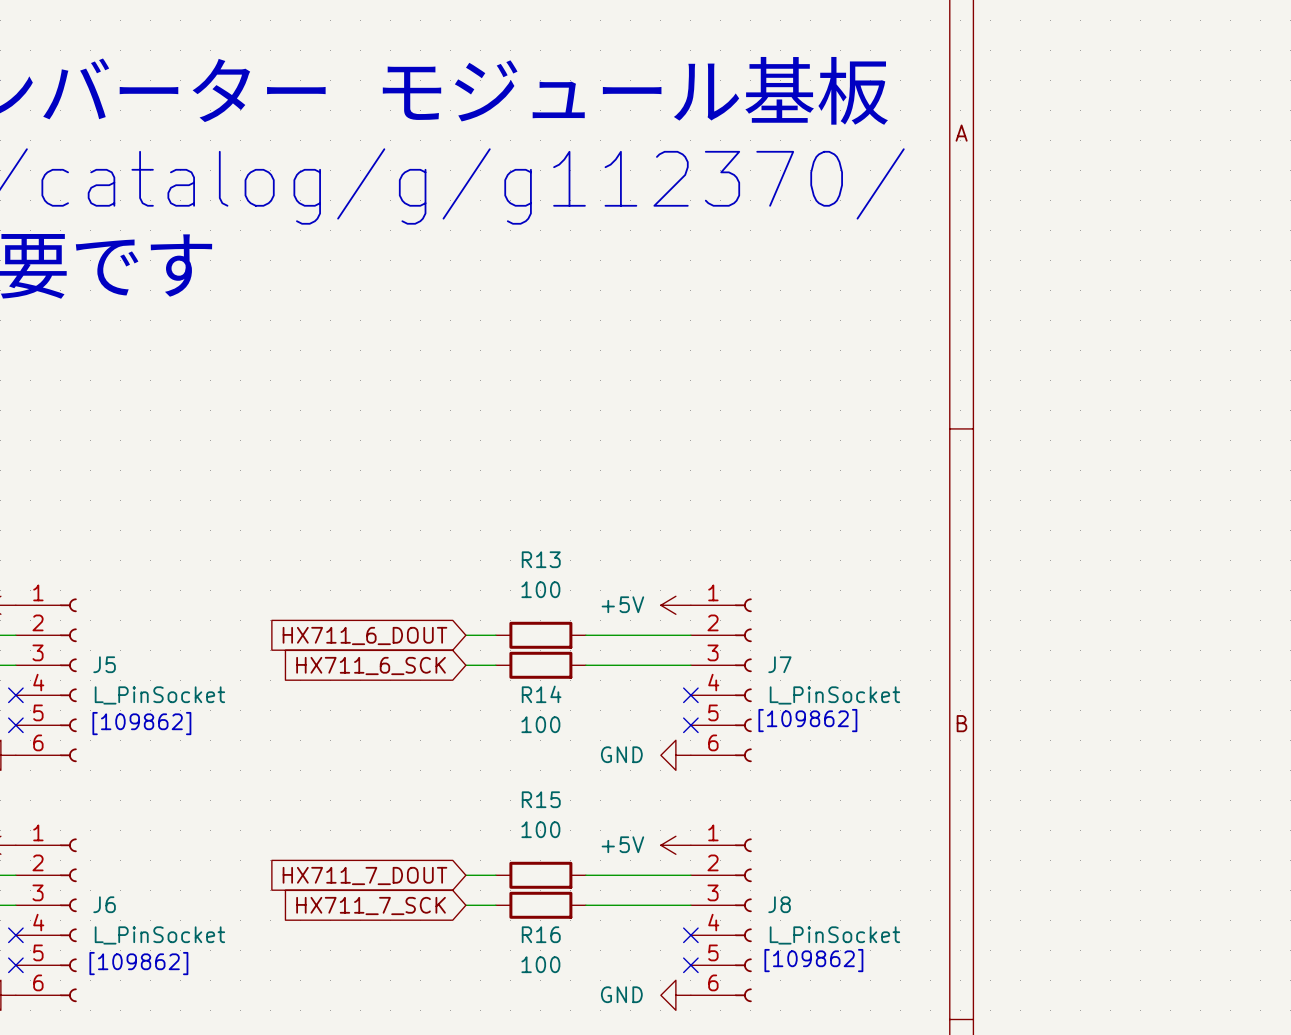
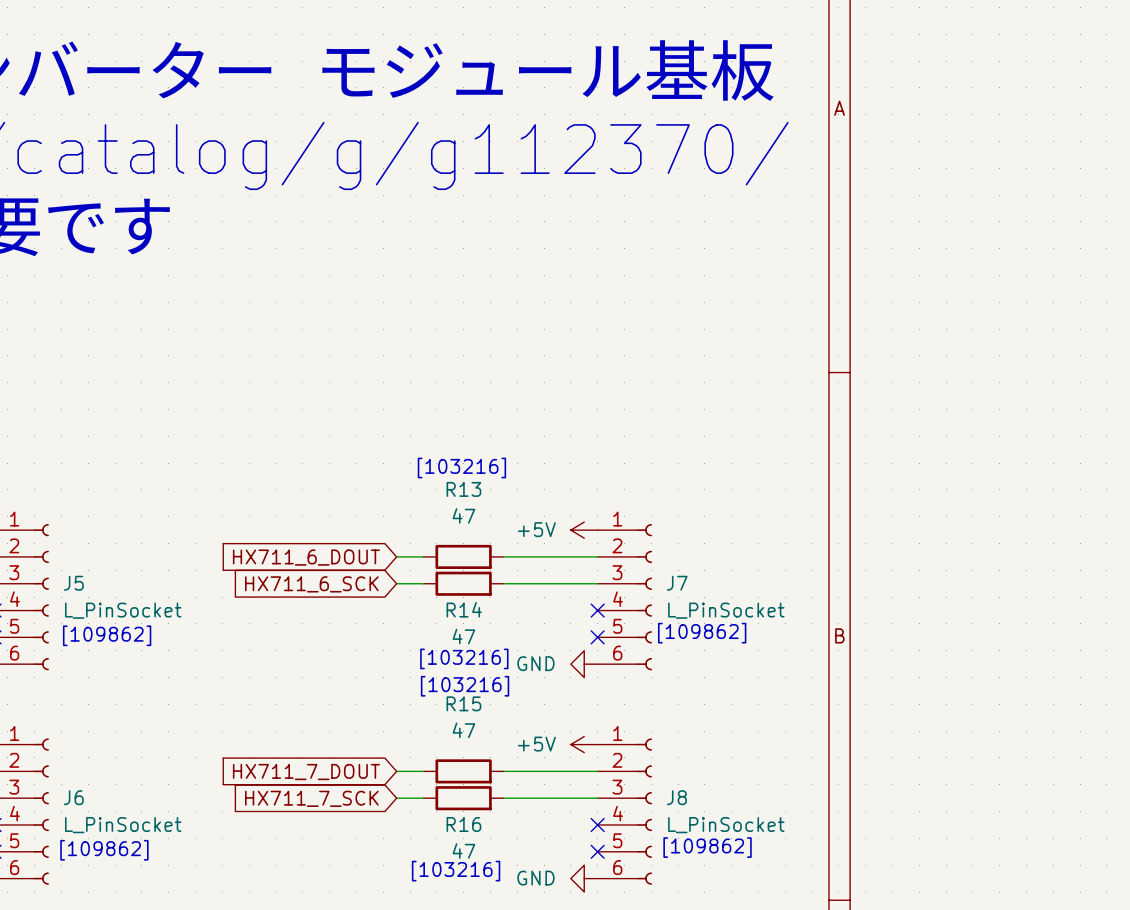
text: none -> [103216] (461, 468)
R13 value: 100 (540, 589) -> 47 (463, 515)
R14 value: 100 (540, 724) -> 47 (463, 636)
text: none -> [103216] (464, 658)
text: none -> [103216] (465, 686)
R15 value: 100 (540, 829) -> 47 (463, 730)
R16 value: 100 (540, 964) -> 47 (463, 850)
text: none -> [103216] (456, 871)

